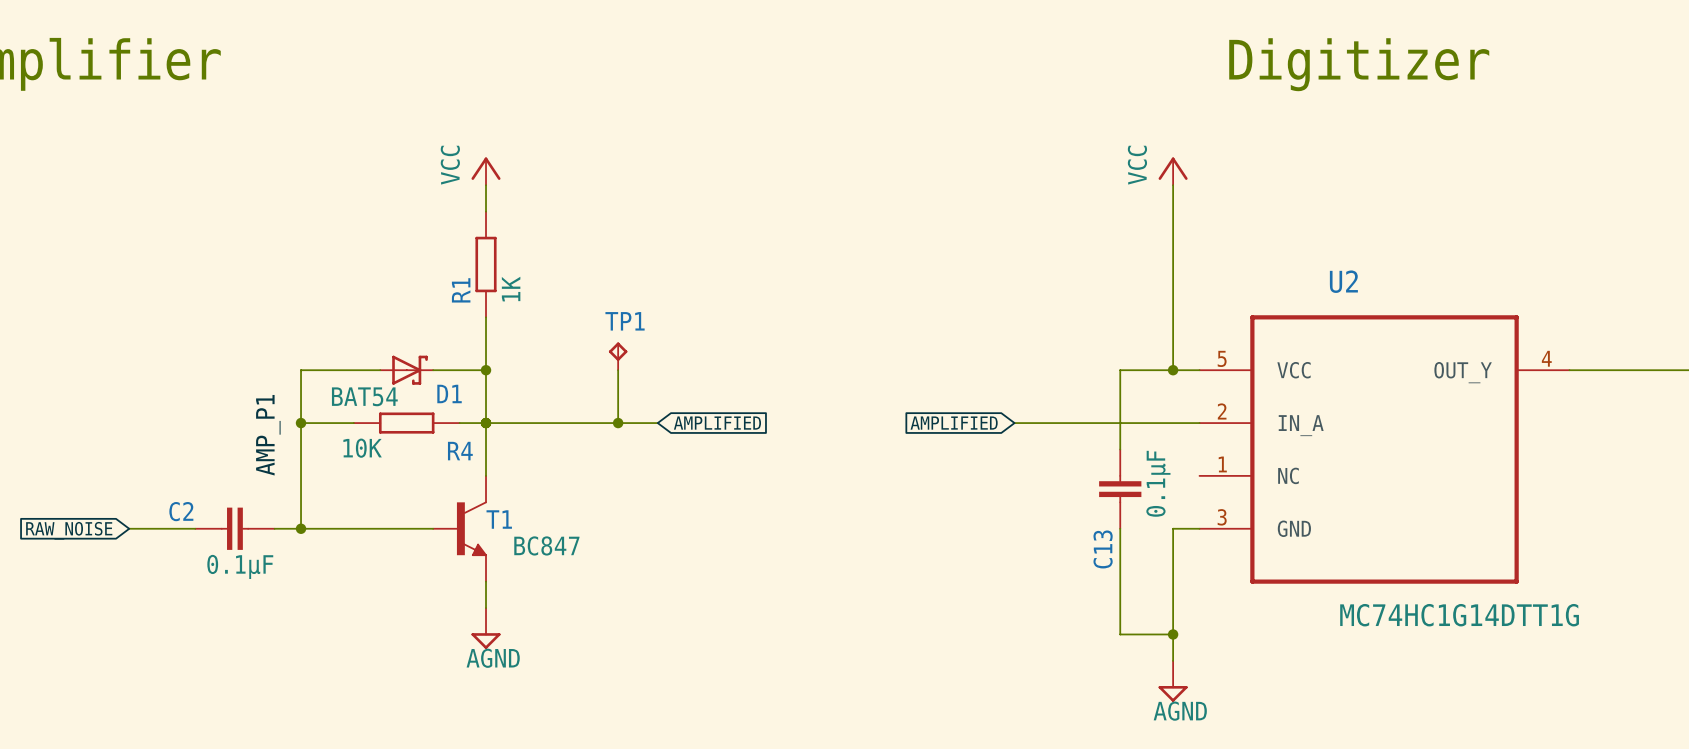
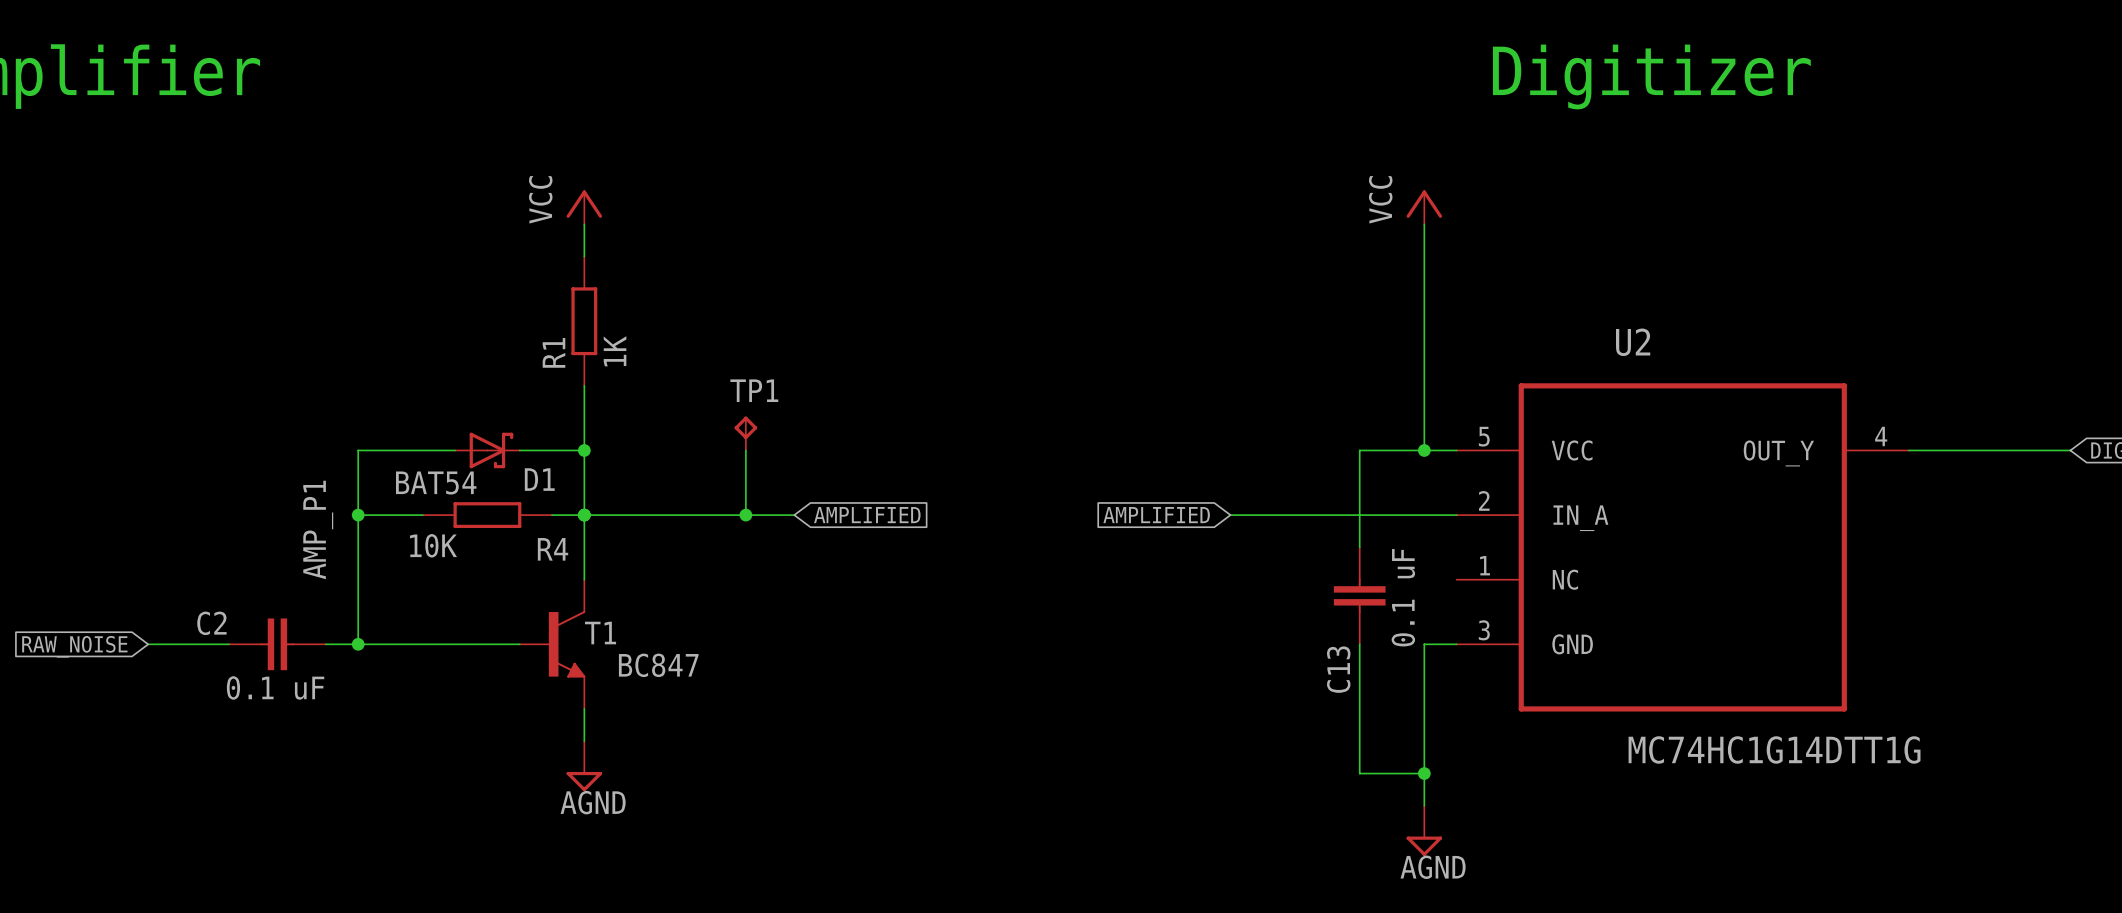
C13 value: 0.1µF (1158, 483) -> 0.1 uF (1403, 597)
C2 value: 0.1µF (240, 566) -> 0.1 uF (275, 687)

